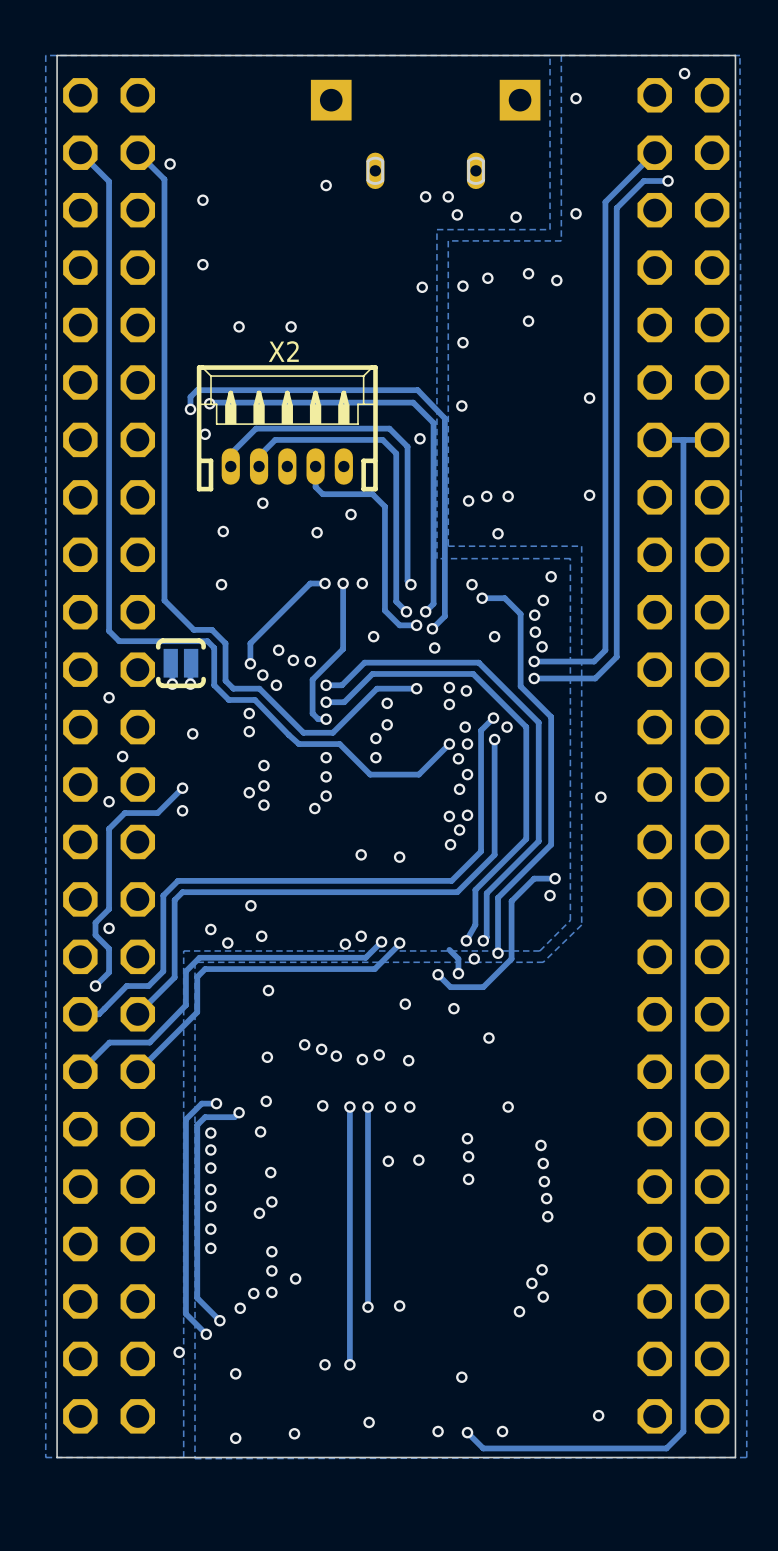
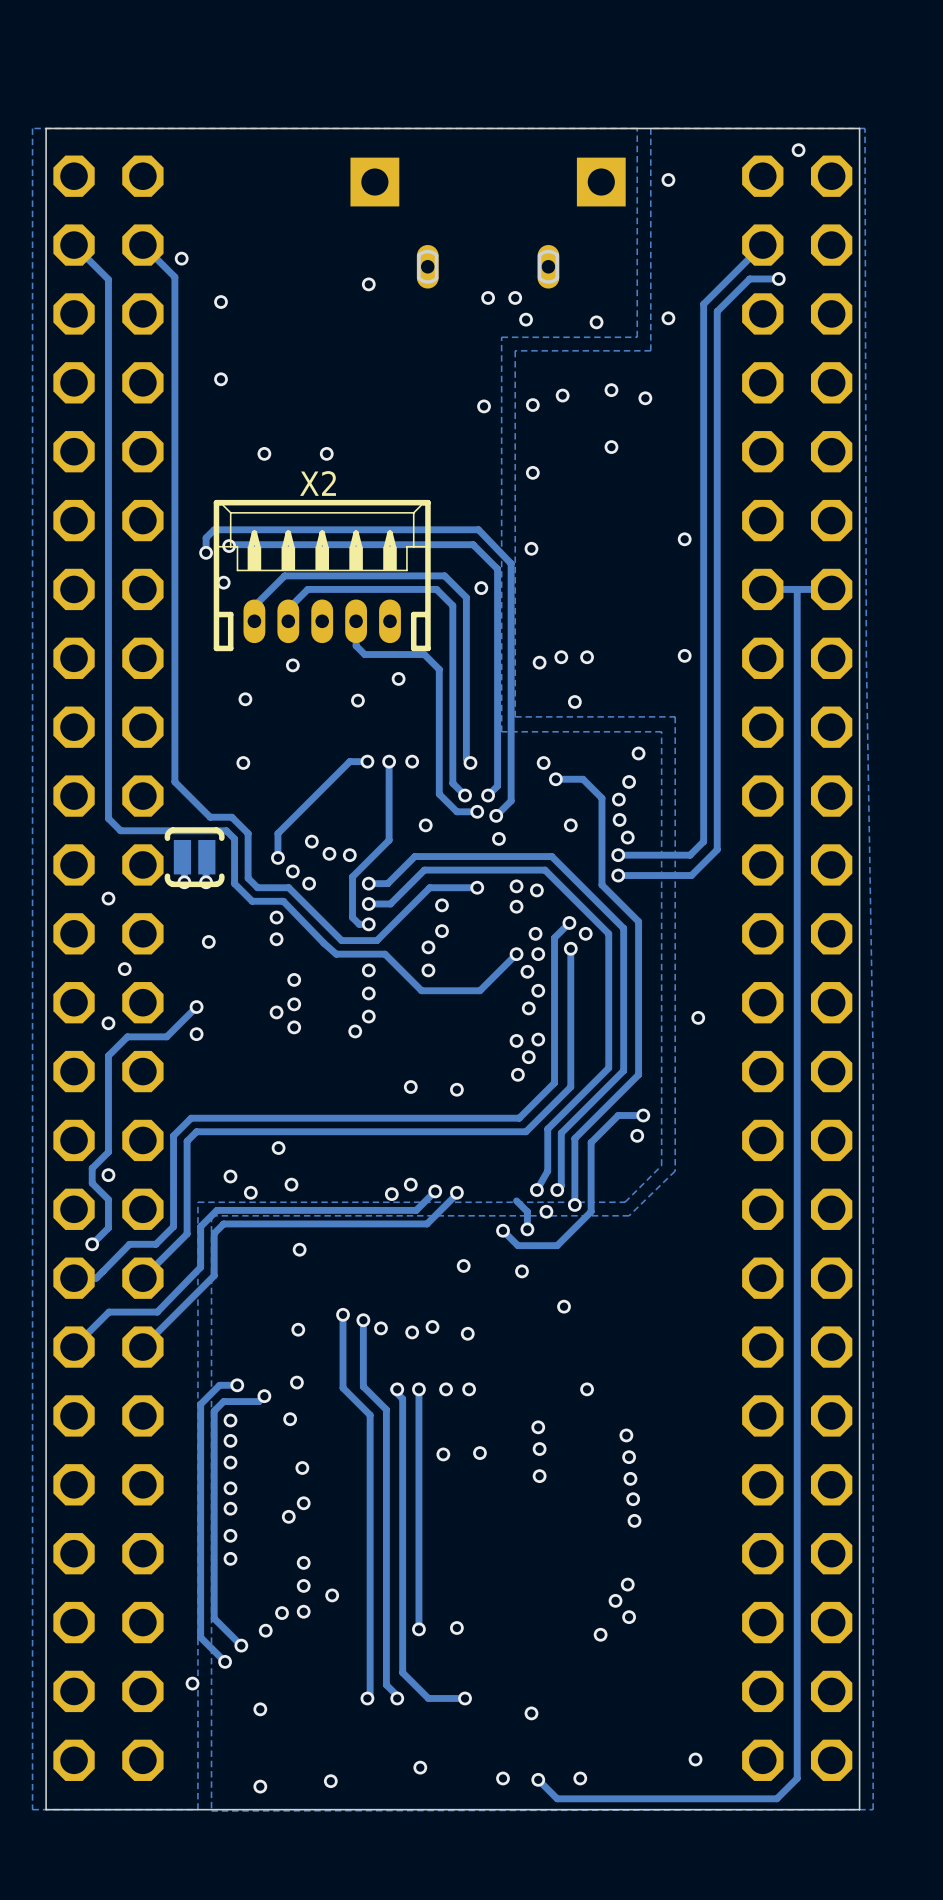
track: none -> (343, 1314) (343, 1388) (370, 1415) (370, 1698)
track: none -> (363, 1320) (363, 1386) (386, 1409) (386, 1684) (398, 1697)
via: (322, 1105) -> none
track: none -> (393, 1389) (402, 1398) (402, 1672) (428, 1698) (465, 1698)
track: (349, 1107) (349, 1364) -> none
via: none -> (465, 1698)

